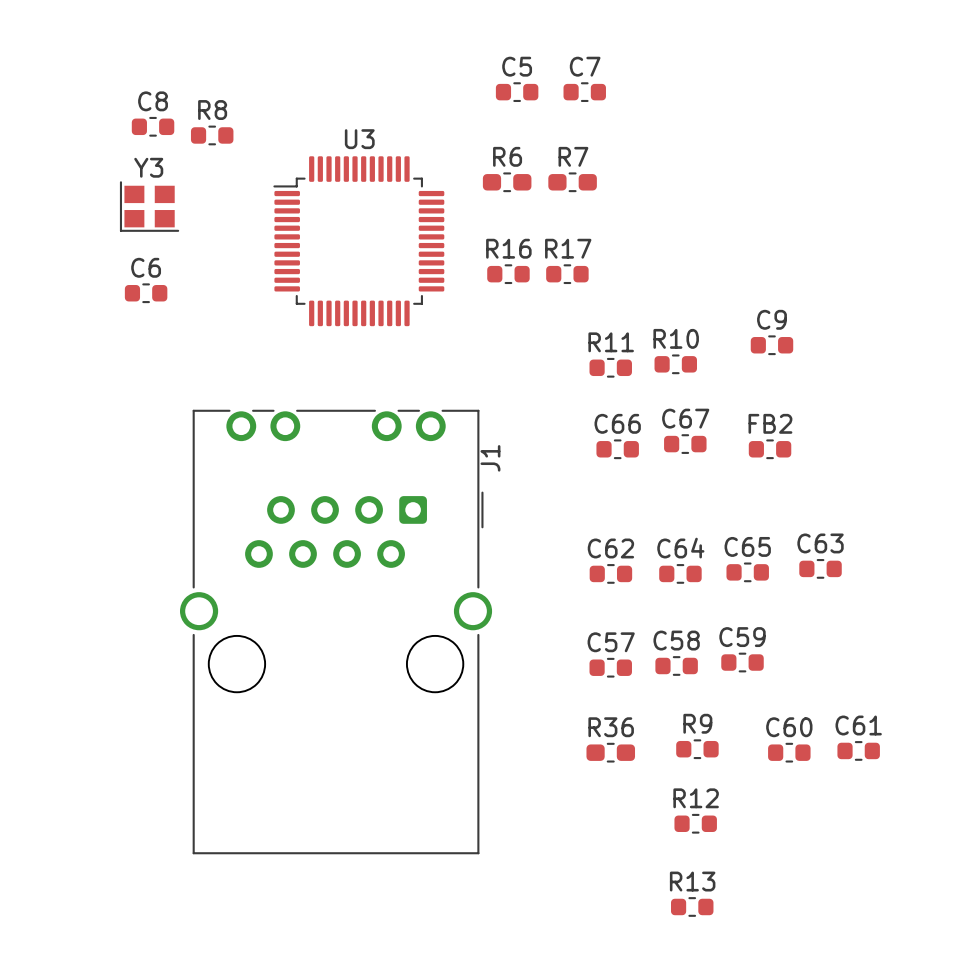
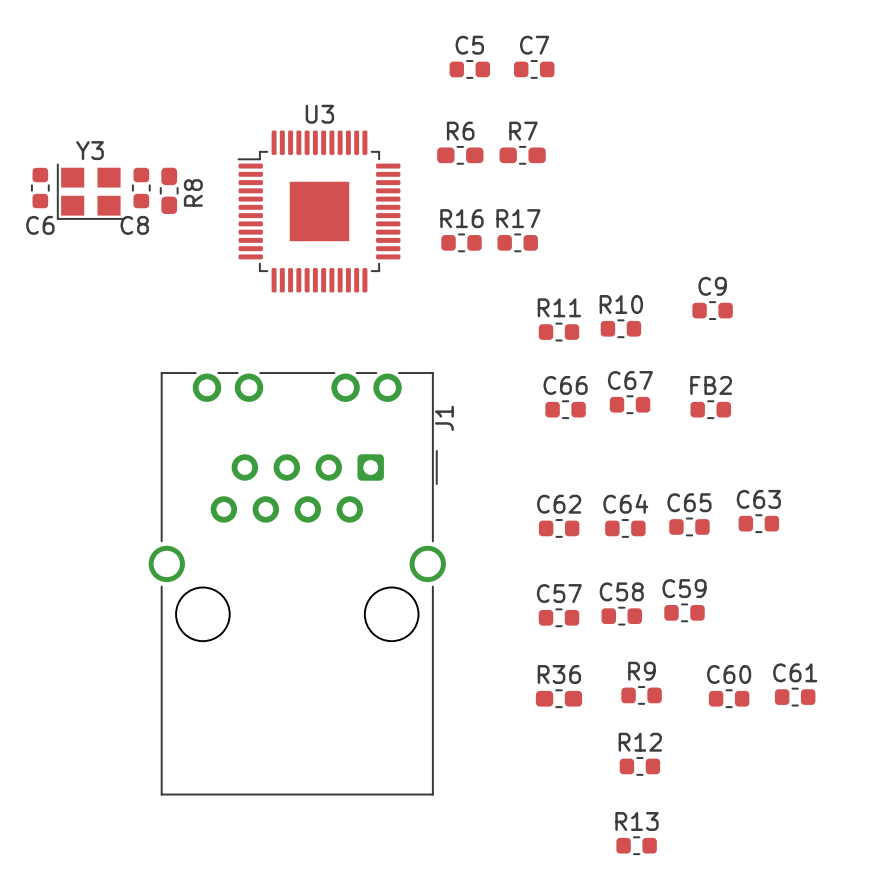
C8 name position: C8 (153, 101) -> C8 (134, 225)
R8 name position: R8 (212, 110) -> R8 (193, 192)
R8 footprint: [190, 125, 234, 146] -> [159, 167, 179, 214]
C8 rotation: 0° (153, 126) -> 90° clockwise (141, 188)
C8 position: (153, 126) -> (141, 188)
U3 footprint: [273, 156, 445, 327] -> [237, 130, 401, 293]
Y3 footprint: [119, 181, 180, 232] -> [56, 163, 125, 220]
C6 name position: C6 (146, 267) -> C6 (40, 225)
C6 rotation: 0° (146, 293) -> 90° clockwise (40, 188)
C6 position: (146, 293) -> (40, 188)

